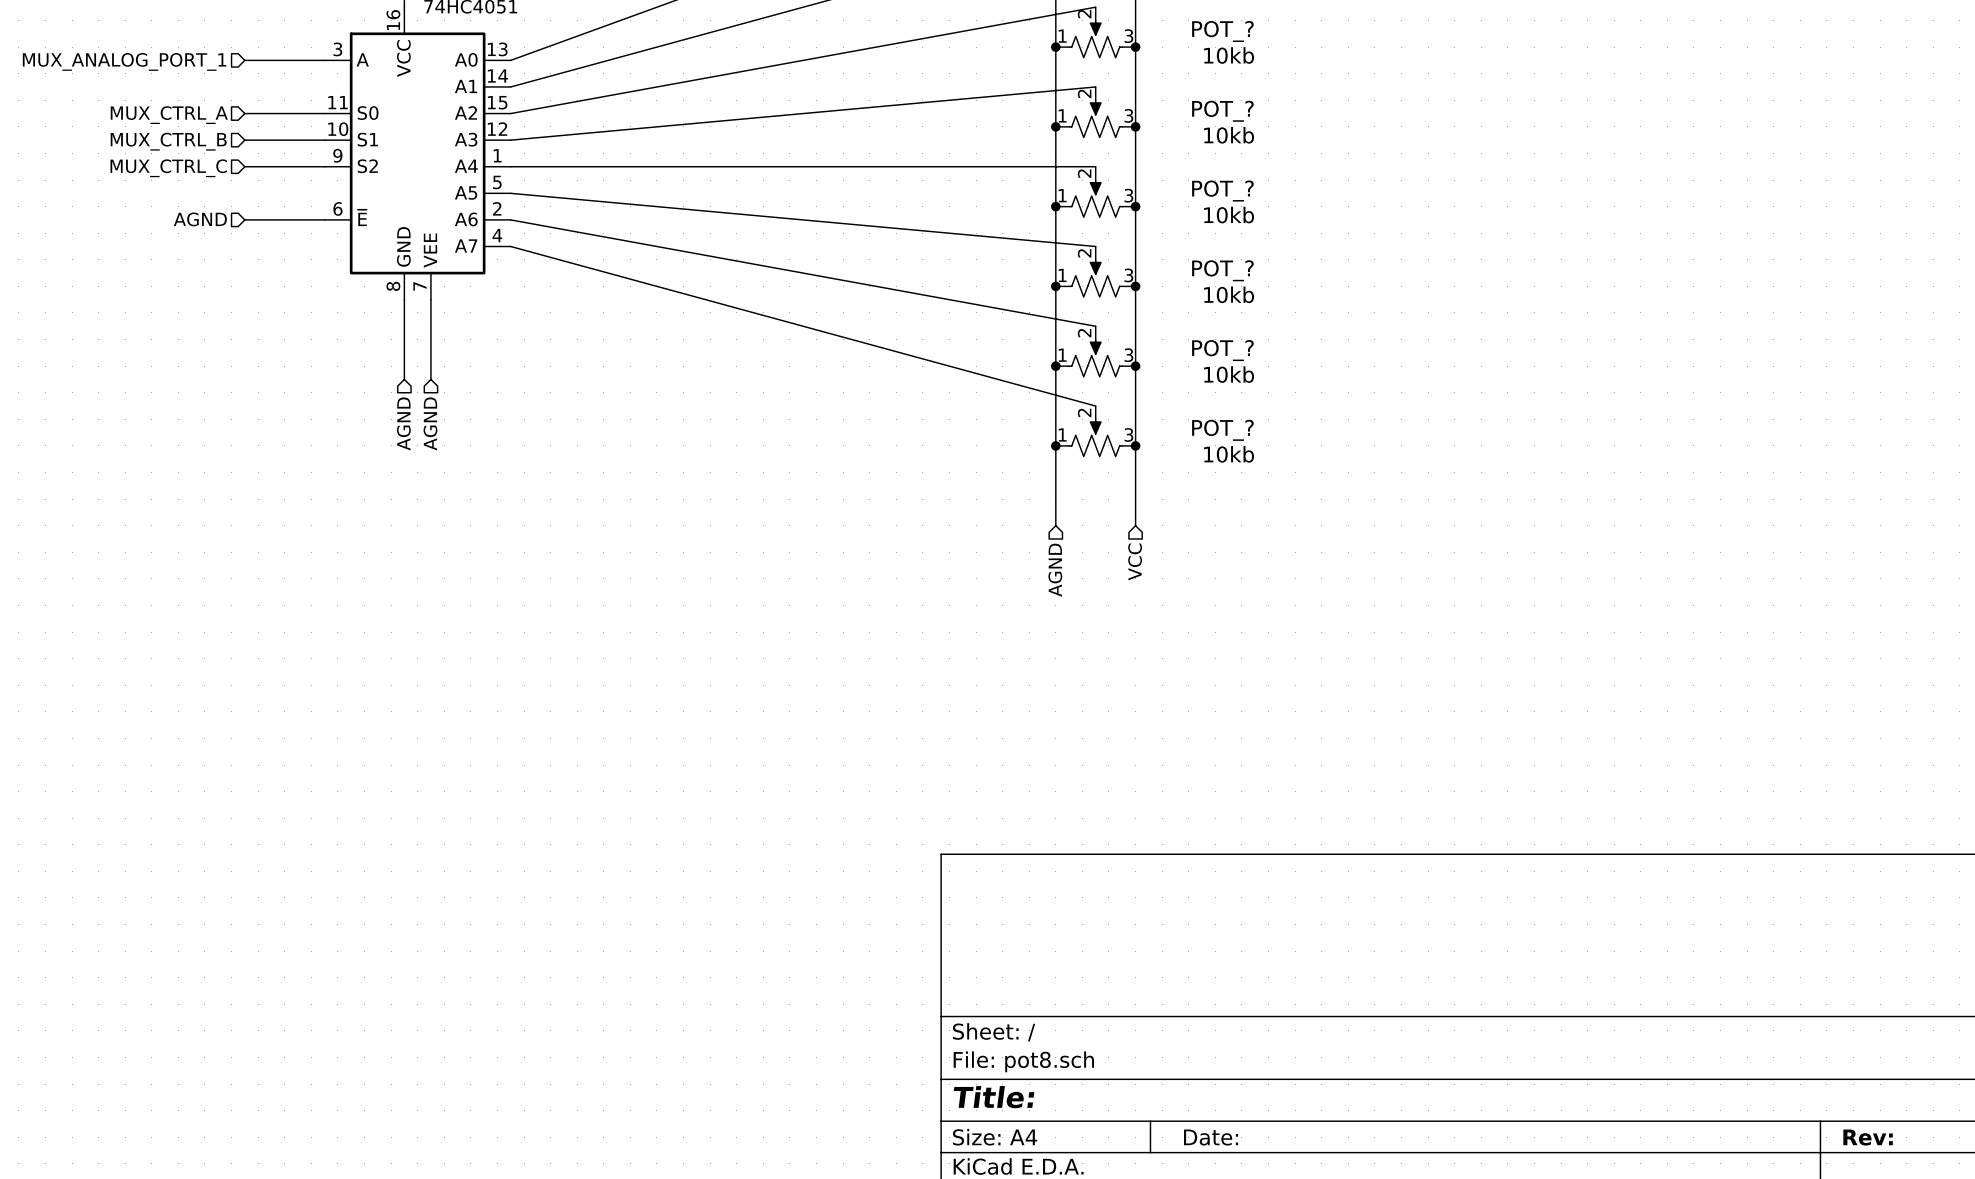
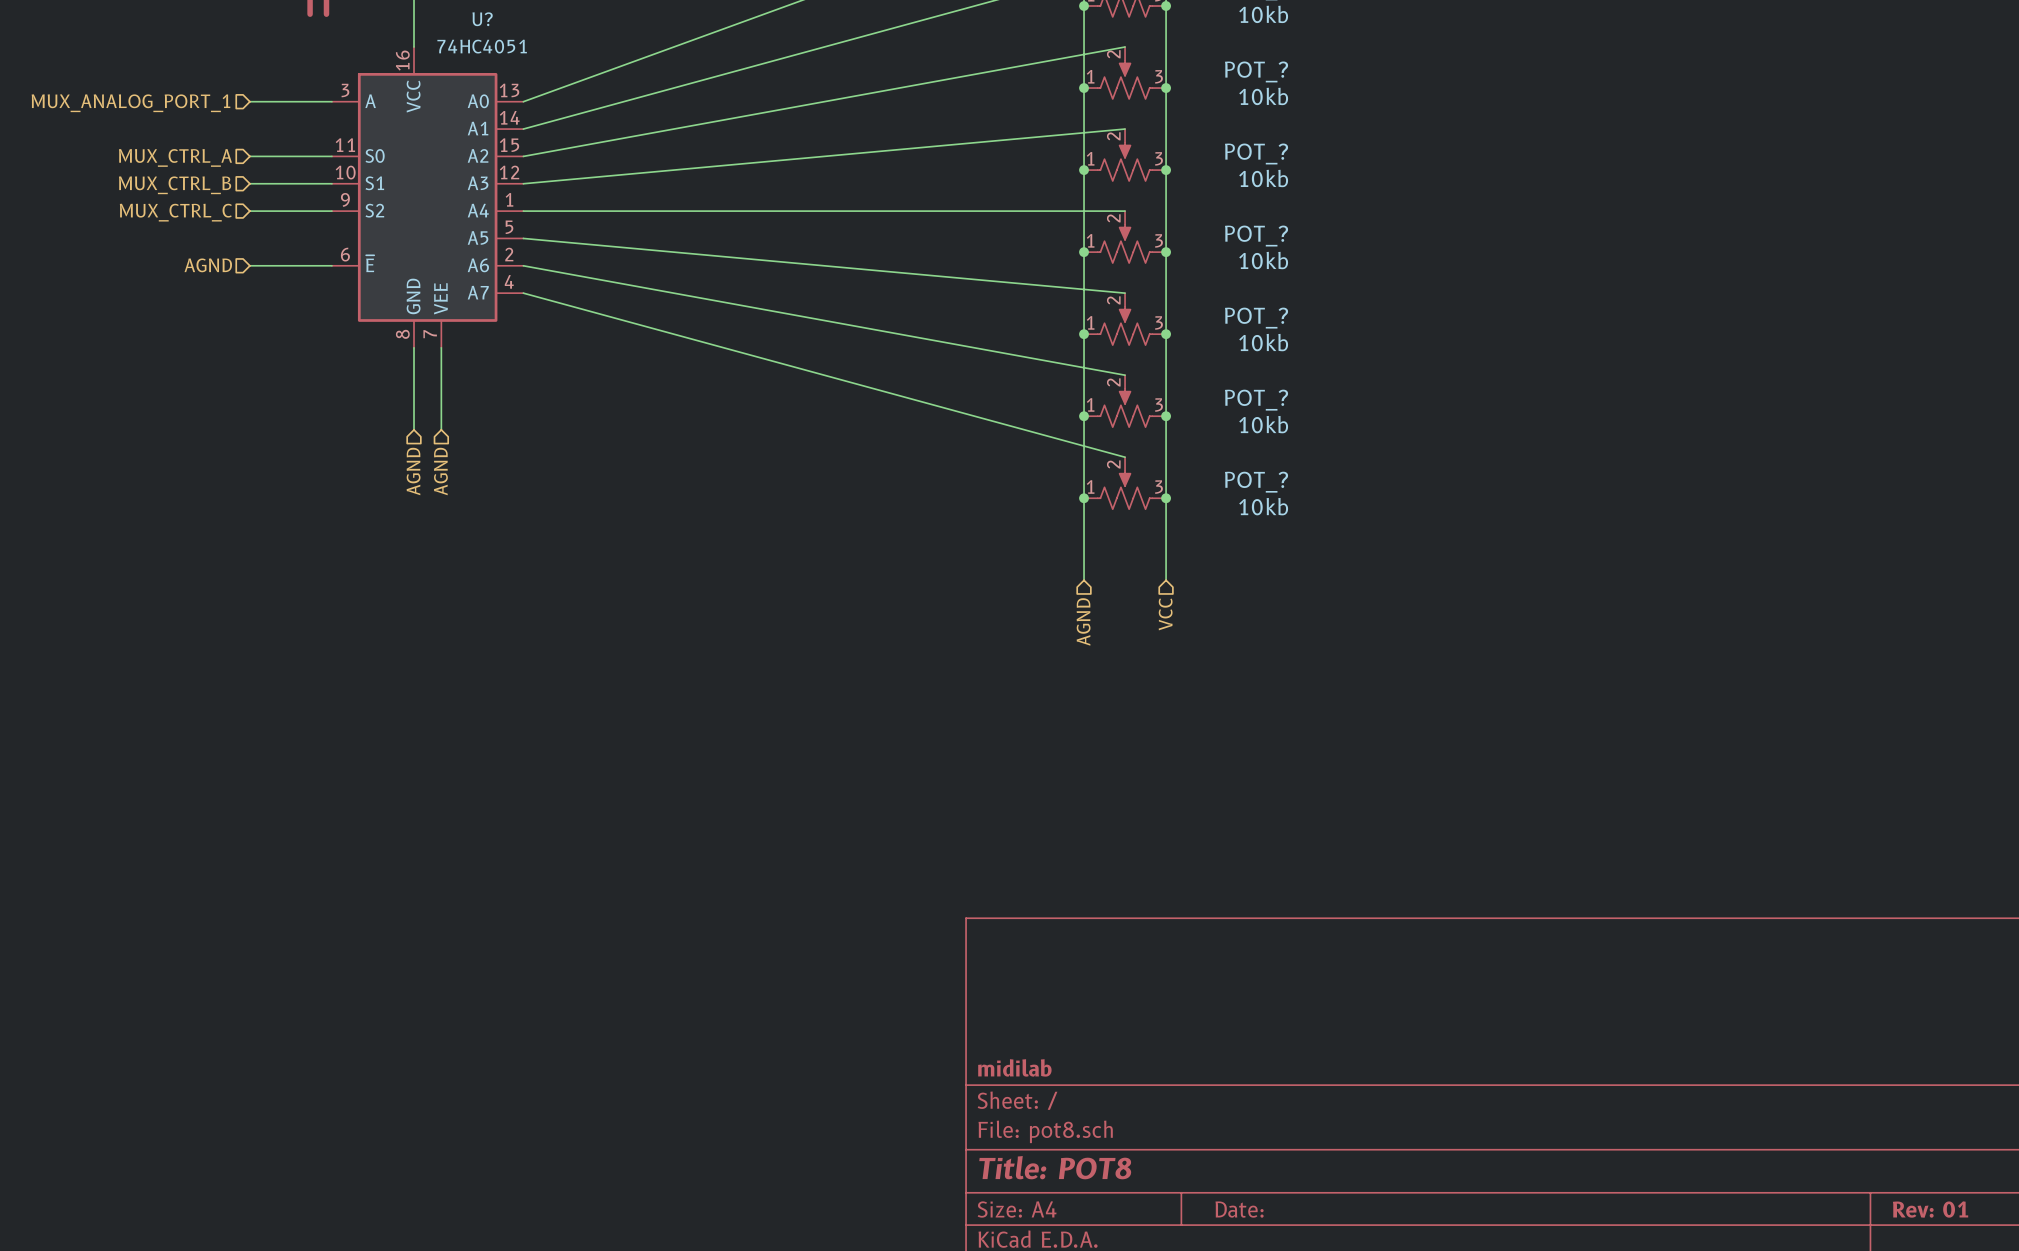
title block: none -> midilab (1014, 1067)
title block: Title: (994, 1097) -> Title: POT8 (1055, 1167)
title block: Rev: (1868, 1137) -> Rev: 01 (1930, 1209)

